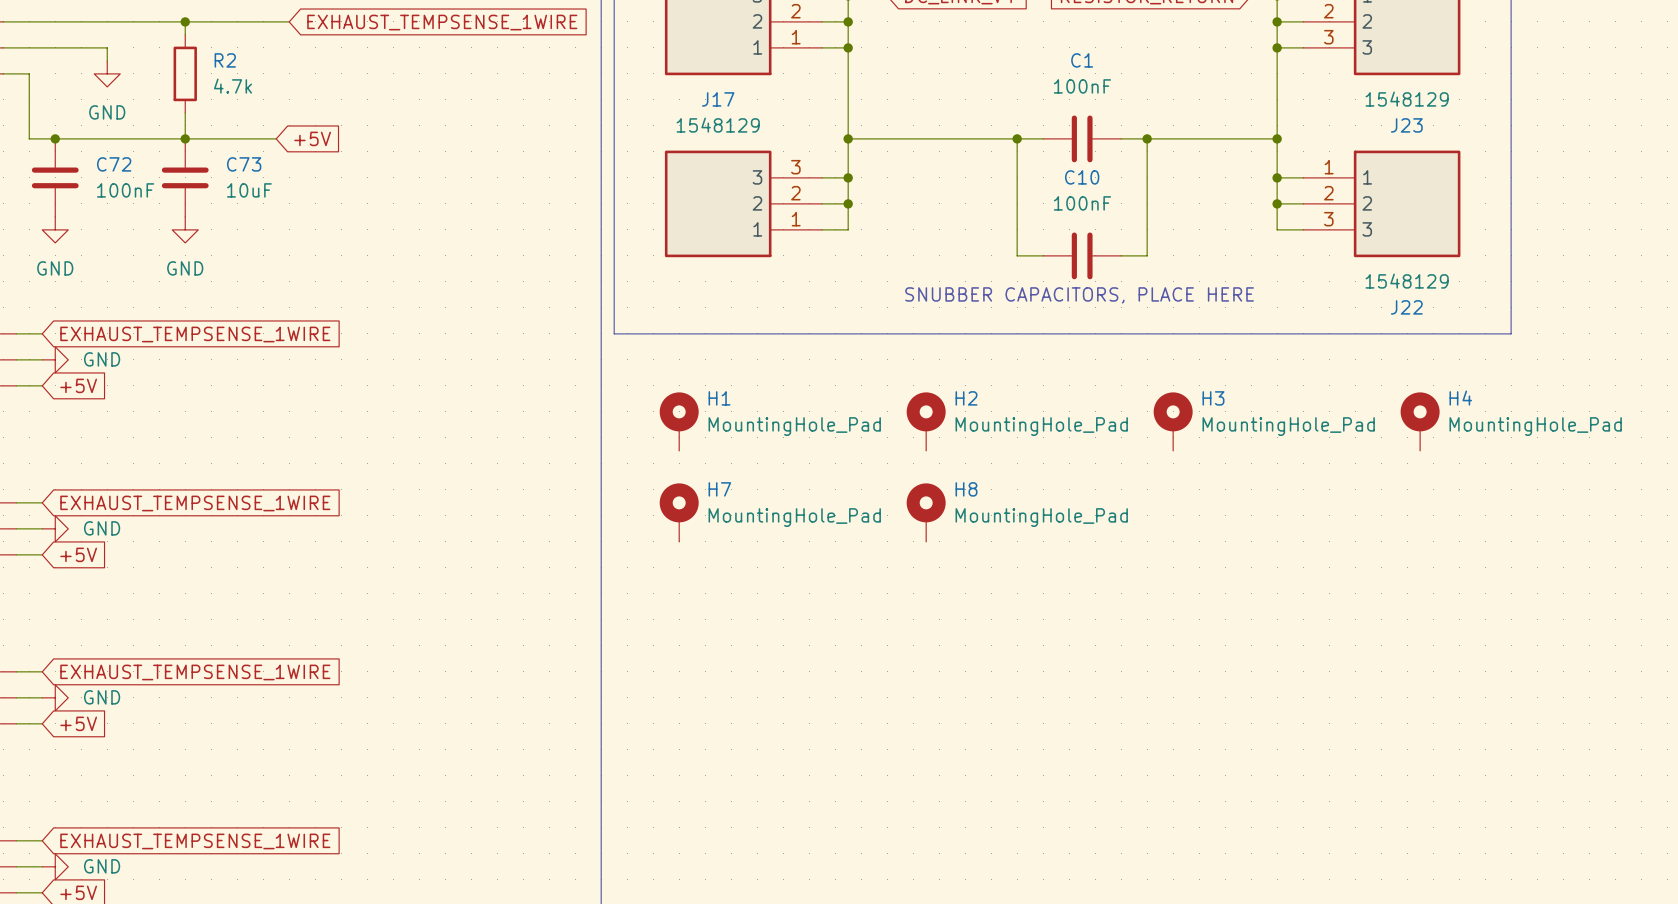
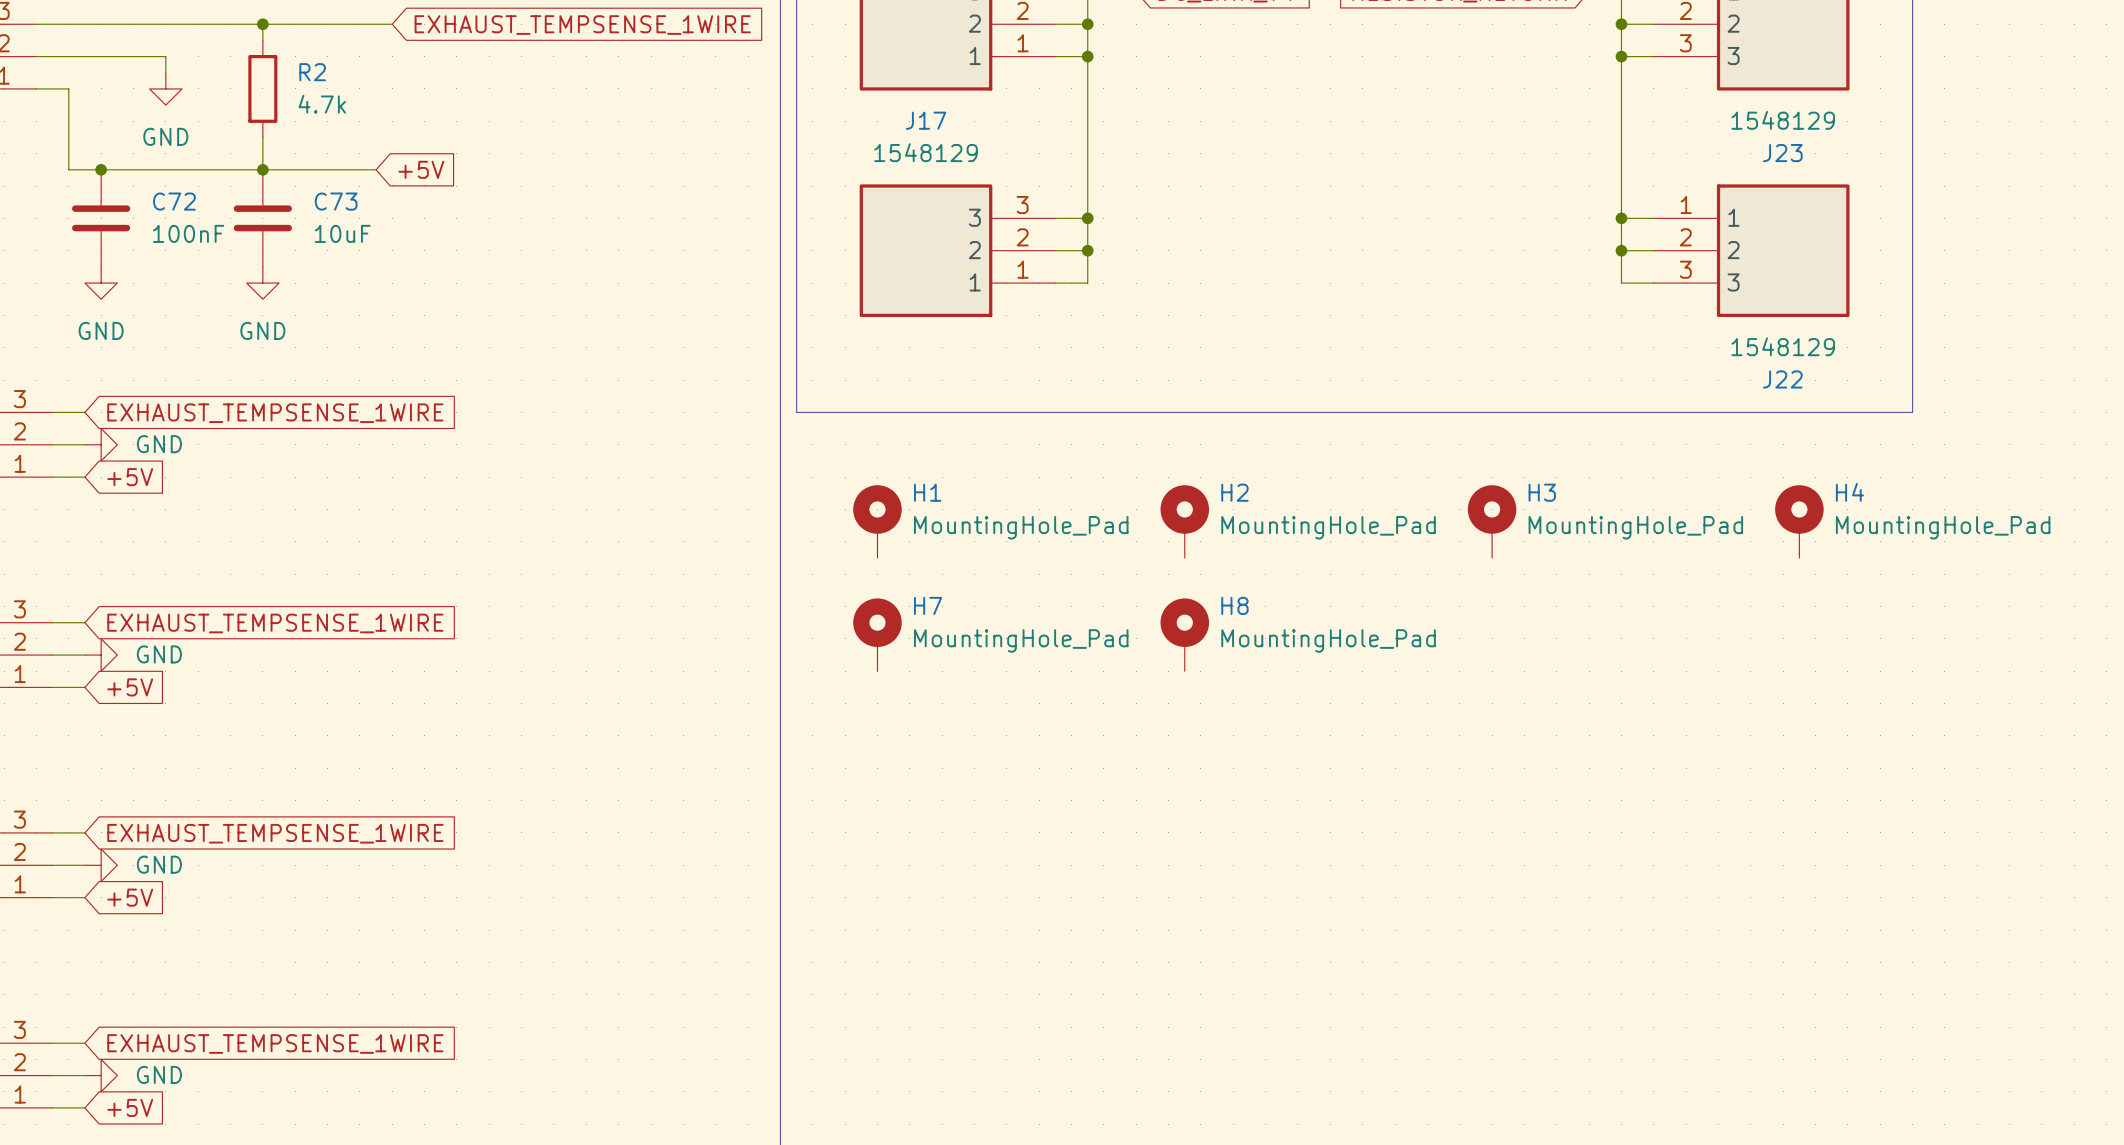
wire: (848, 138) (1043, 138) -> none
junction: (848, 138) -> none
wire: (1017, 138) (1017, 255) (1043, 255) -> none
junction: (1017, 138) -> none
C1: 100nF (1082, 138) -> none
wire: (1121, 138) (1277, 138) -> none
wire: (1147, 138) (1147, 255) (1121, 255) -> none
junction: (1147, 138) -> none
junction: (1277, 138) -> none
C10: 100nF (1082, 255) -> none
text: SNUBBER CAPACITORS, PLACE HERE (1079, 295) -> none

